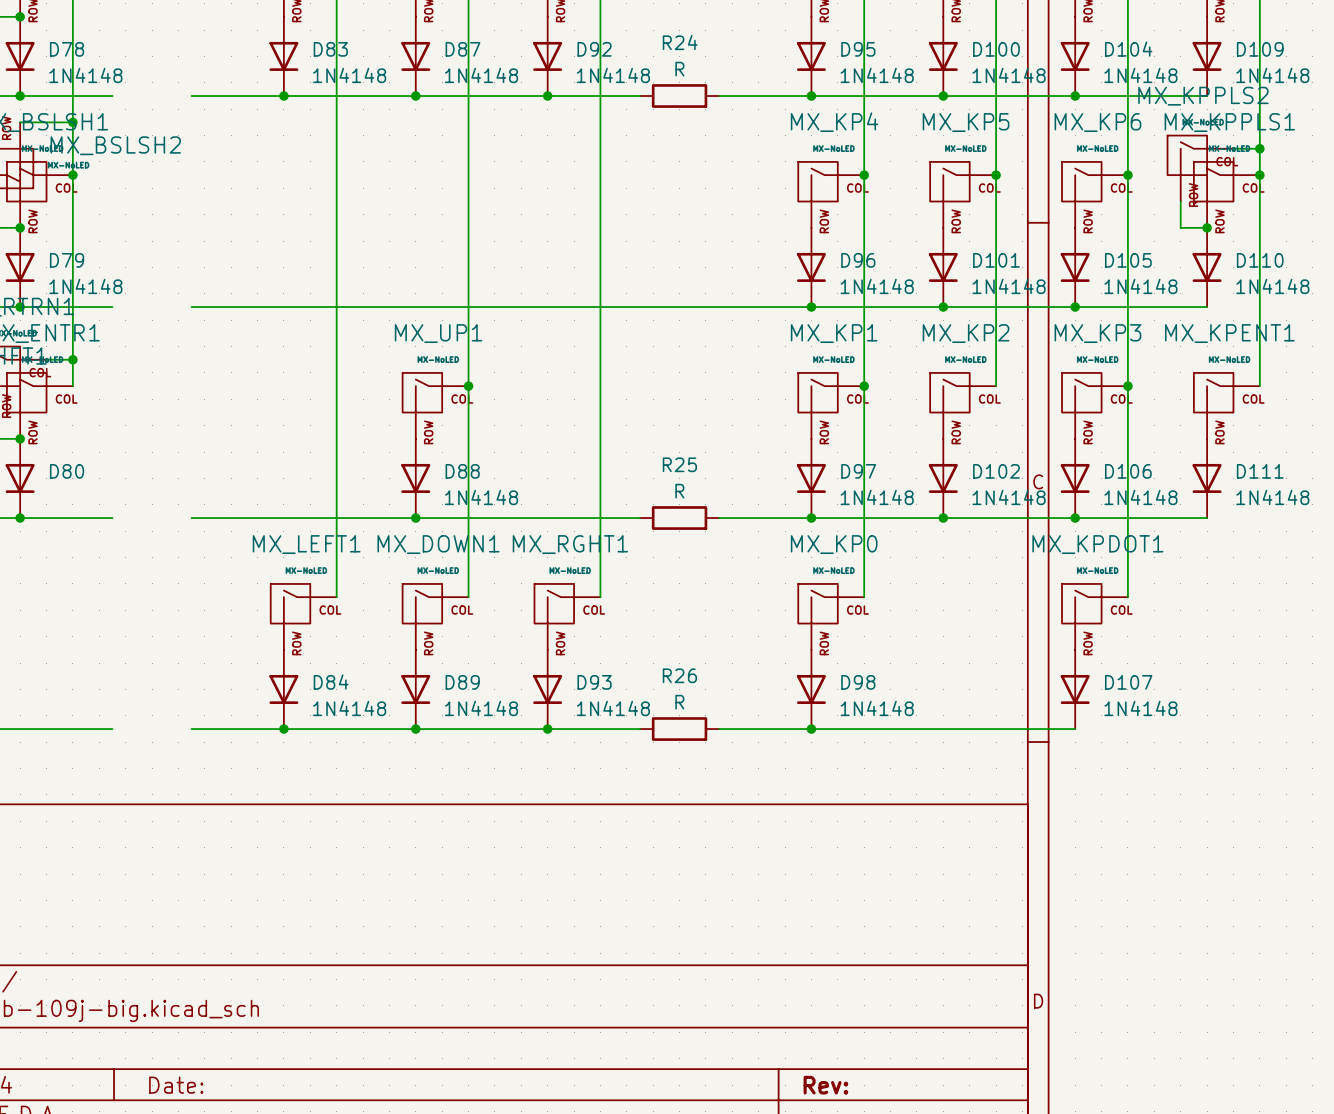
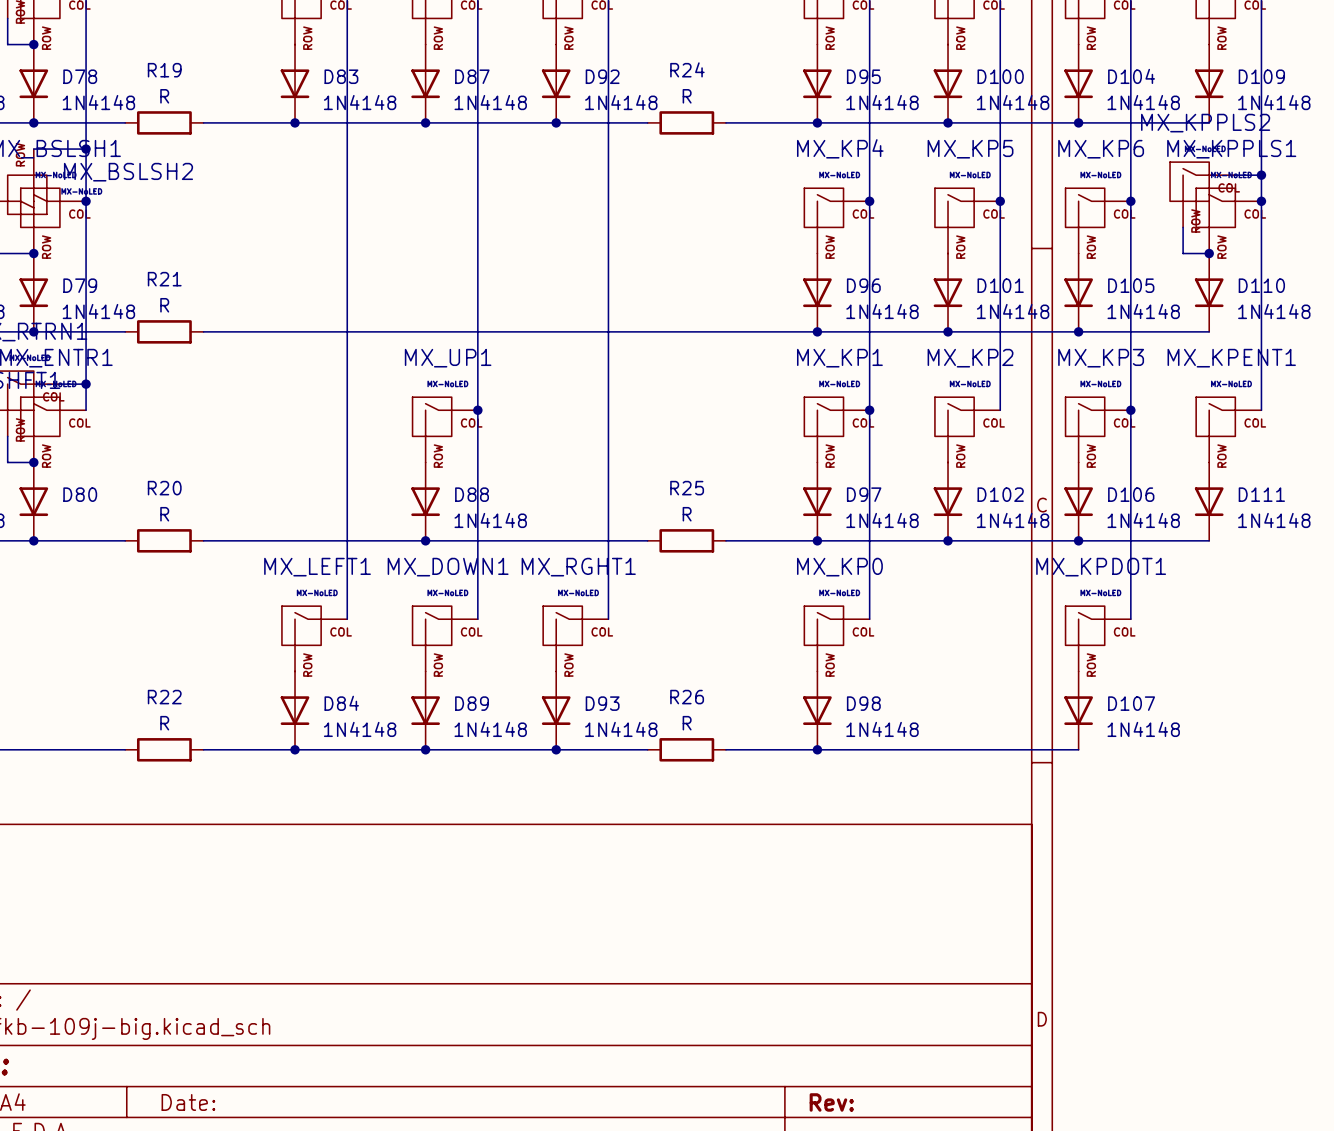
R19: none -> R (164, 122)
R21: none -> R (164, 331)
R20: none -> R (164, 540)
R22: none -> R (164, 749)

